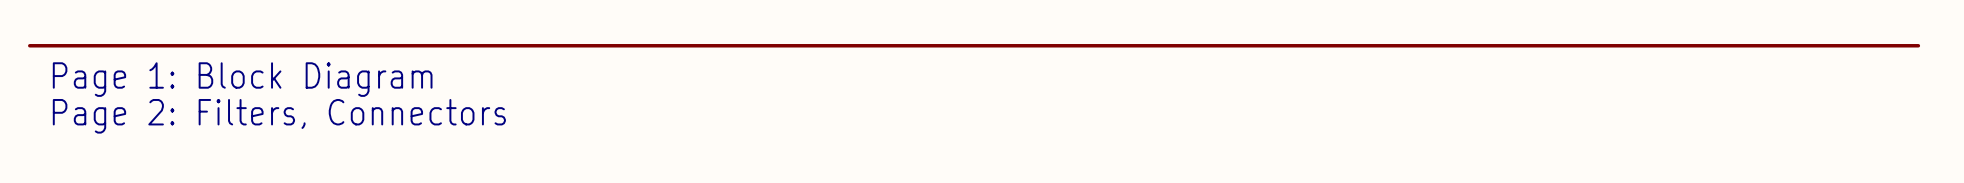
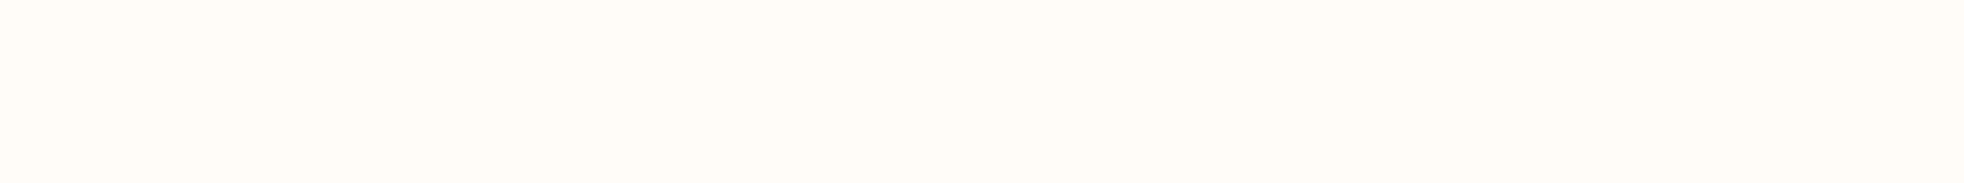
line: (29, 45) (1918, 45) -> none
text: Page 1: Block Diagram (242, 79) -> none
text: Page 2: Filters, Connectors (279, 116) -> none

